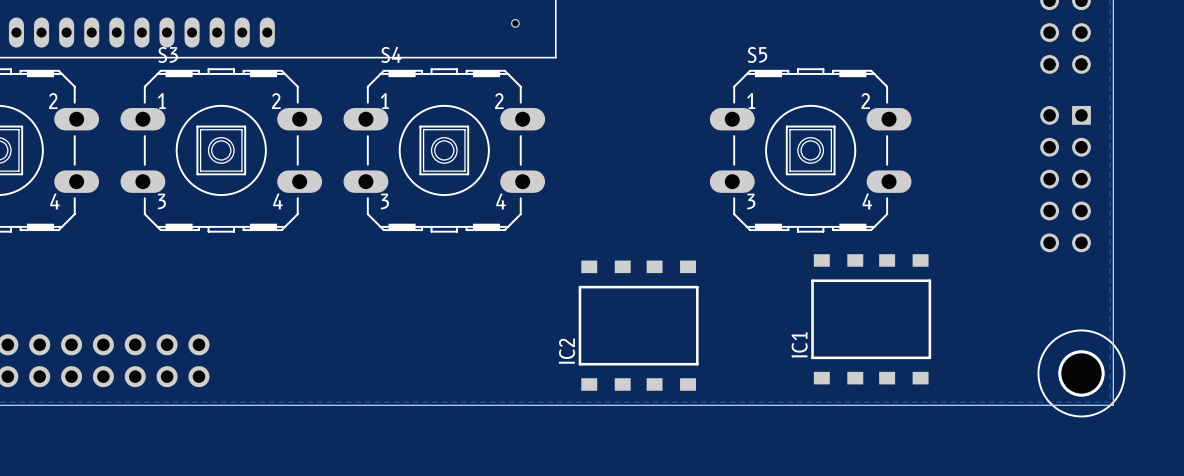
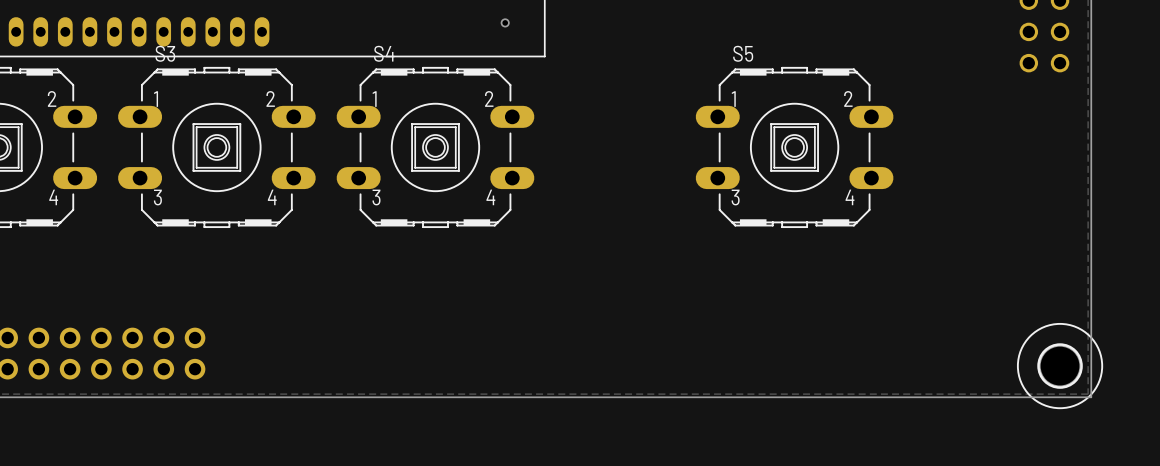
part: (1065, 179) -> none
IC1: (871, 319) -> none
IC2: (638, 325) -> none

